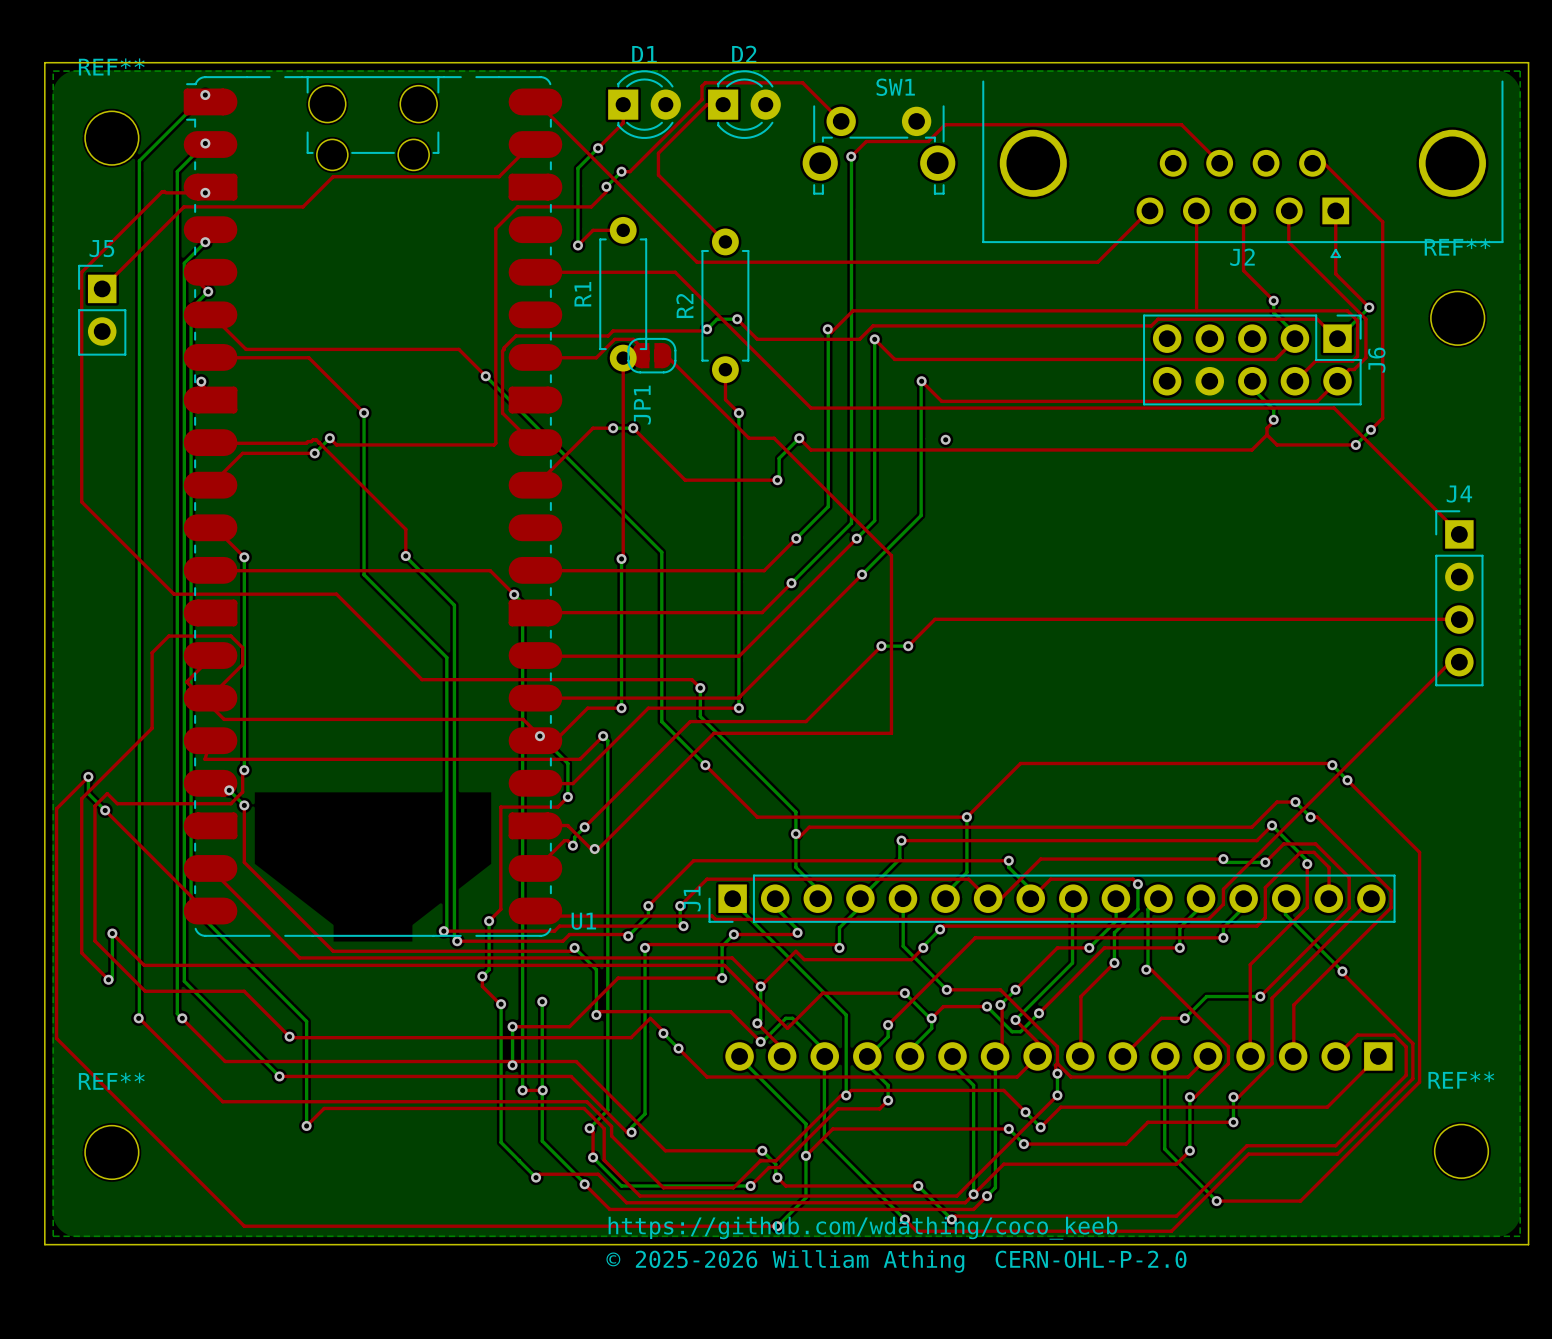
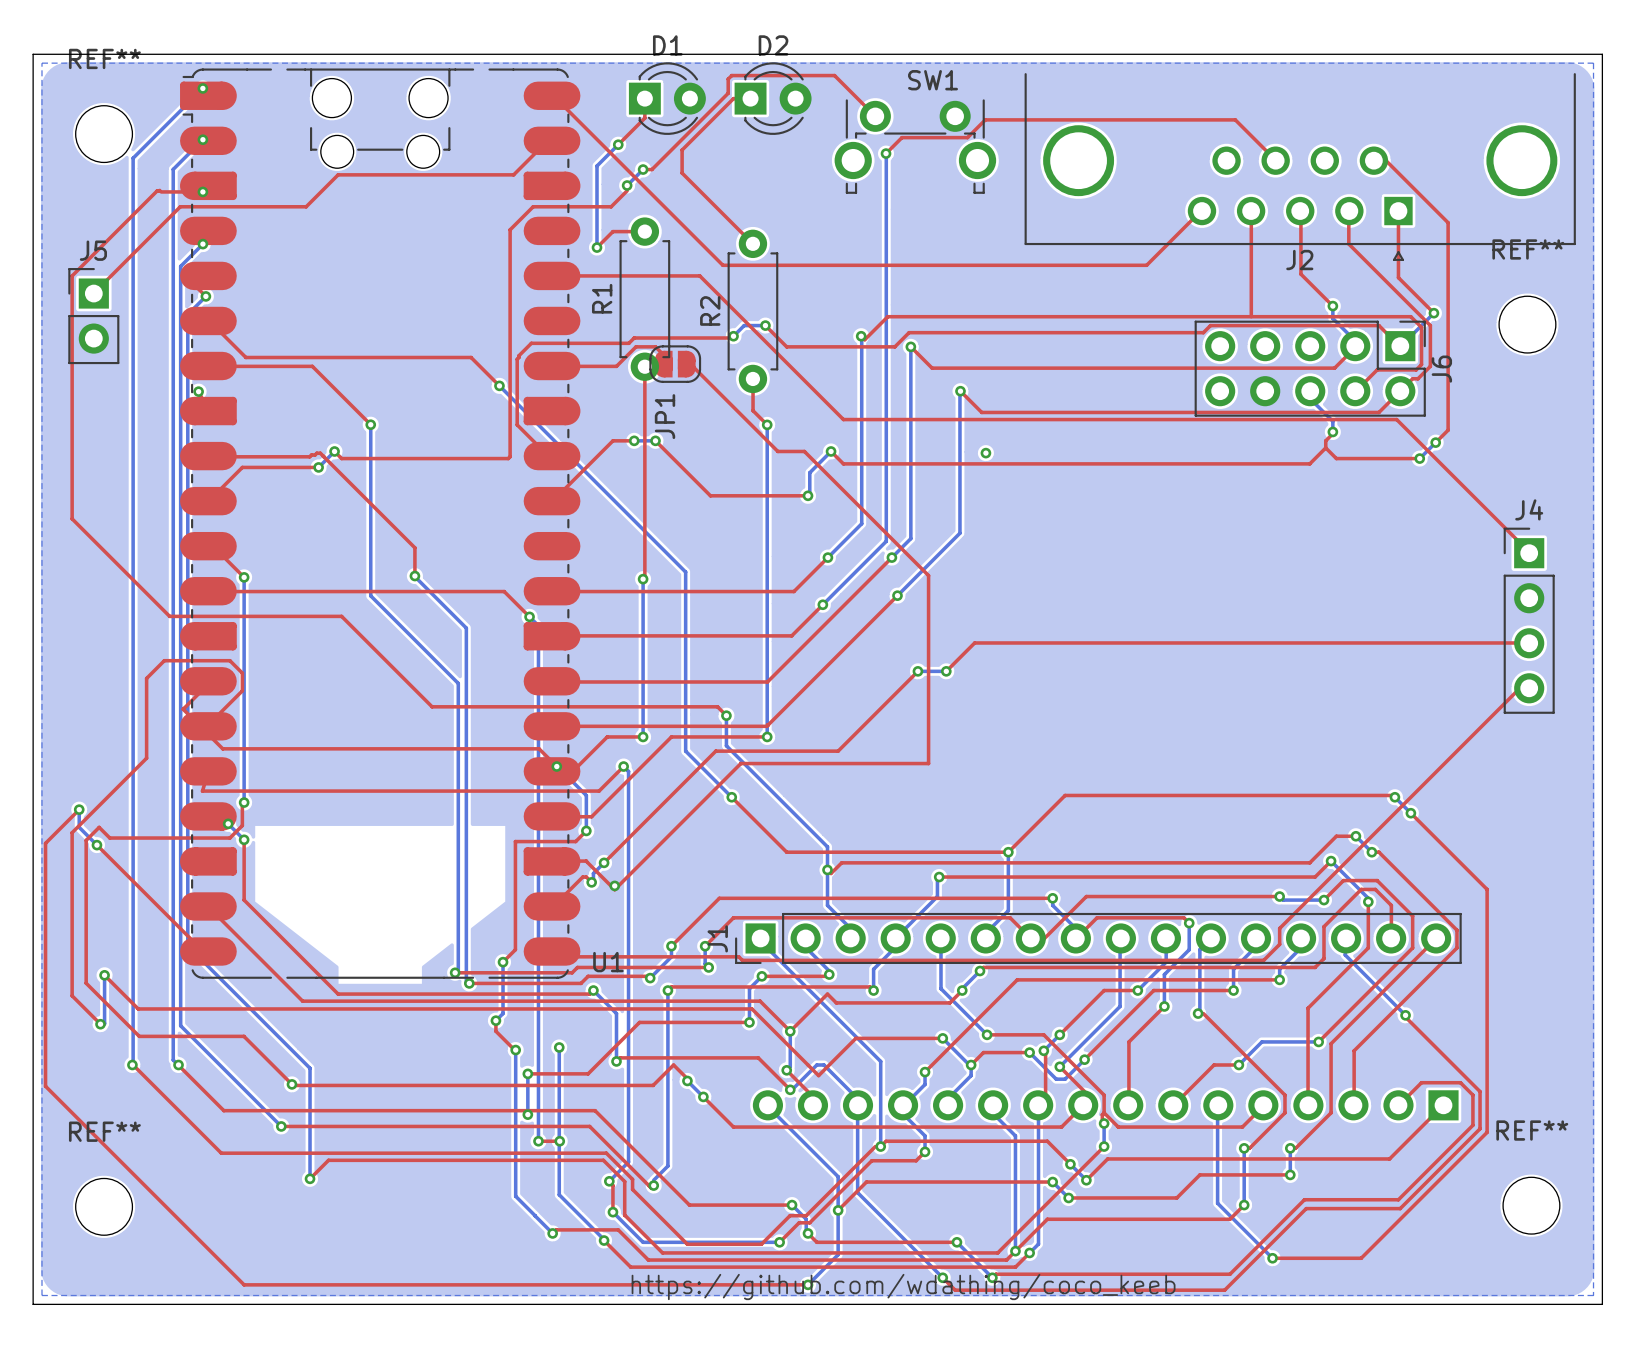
text: © 2025-2026 William Athing CERN-OHL-P-2.0 (896, 1261) -> none

